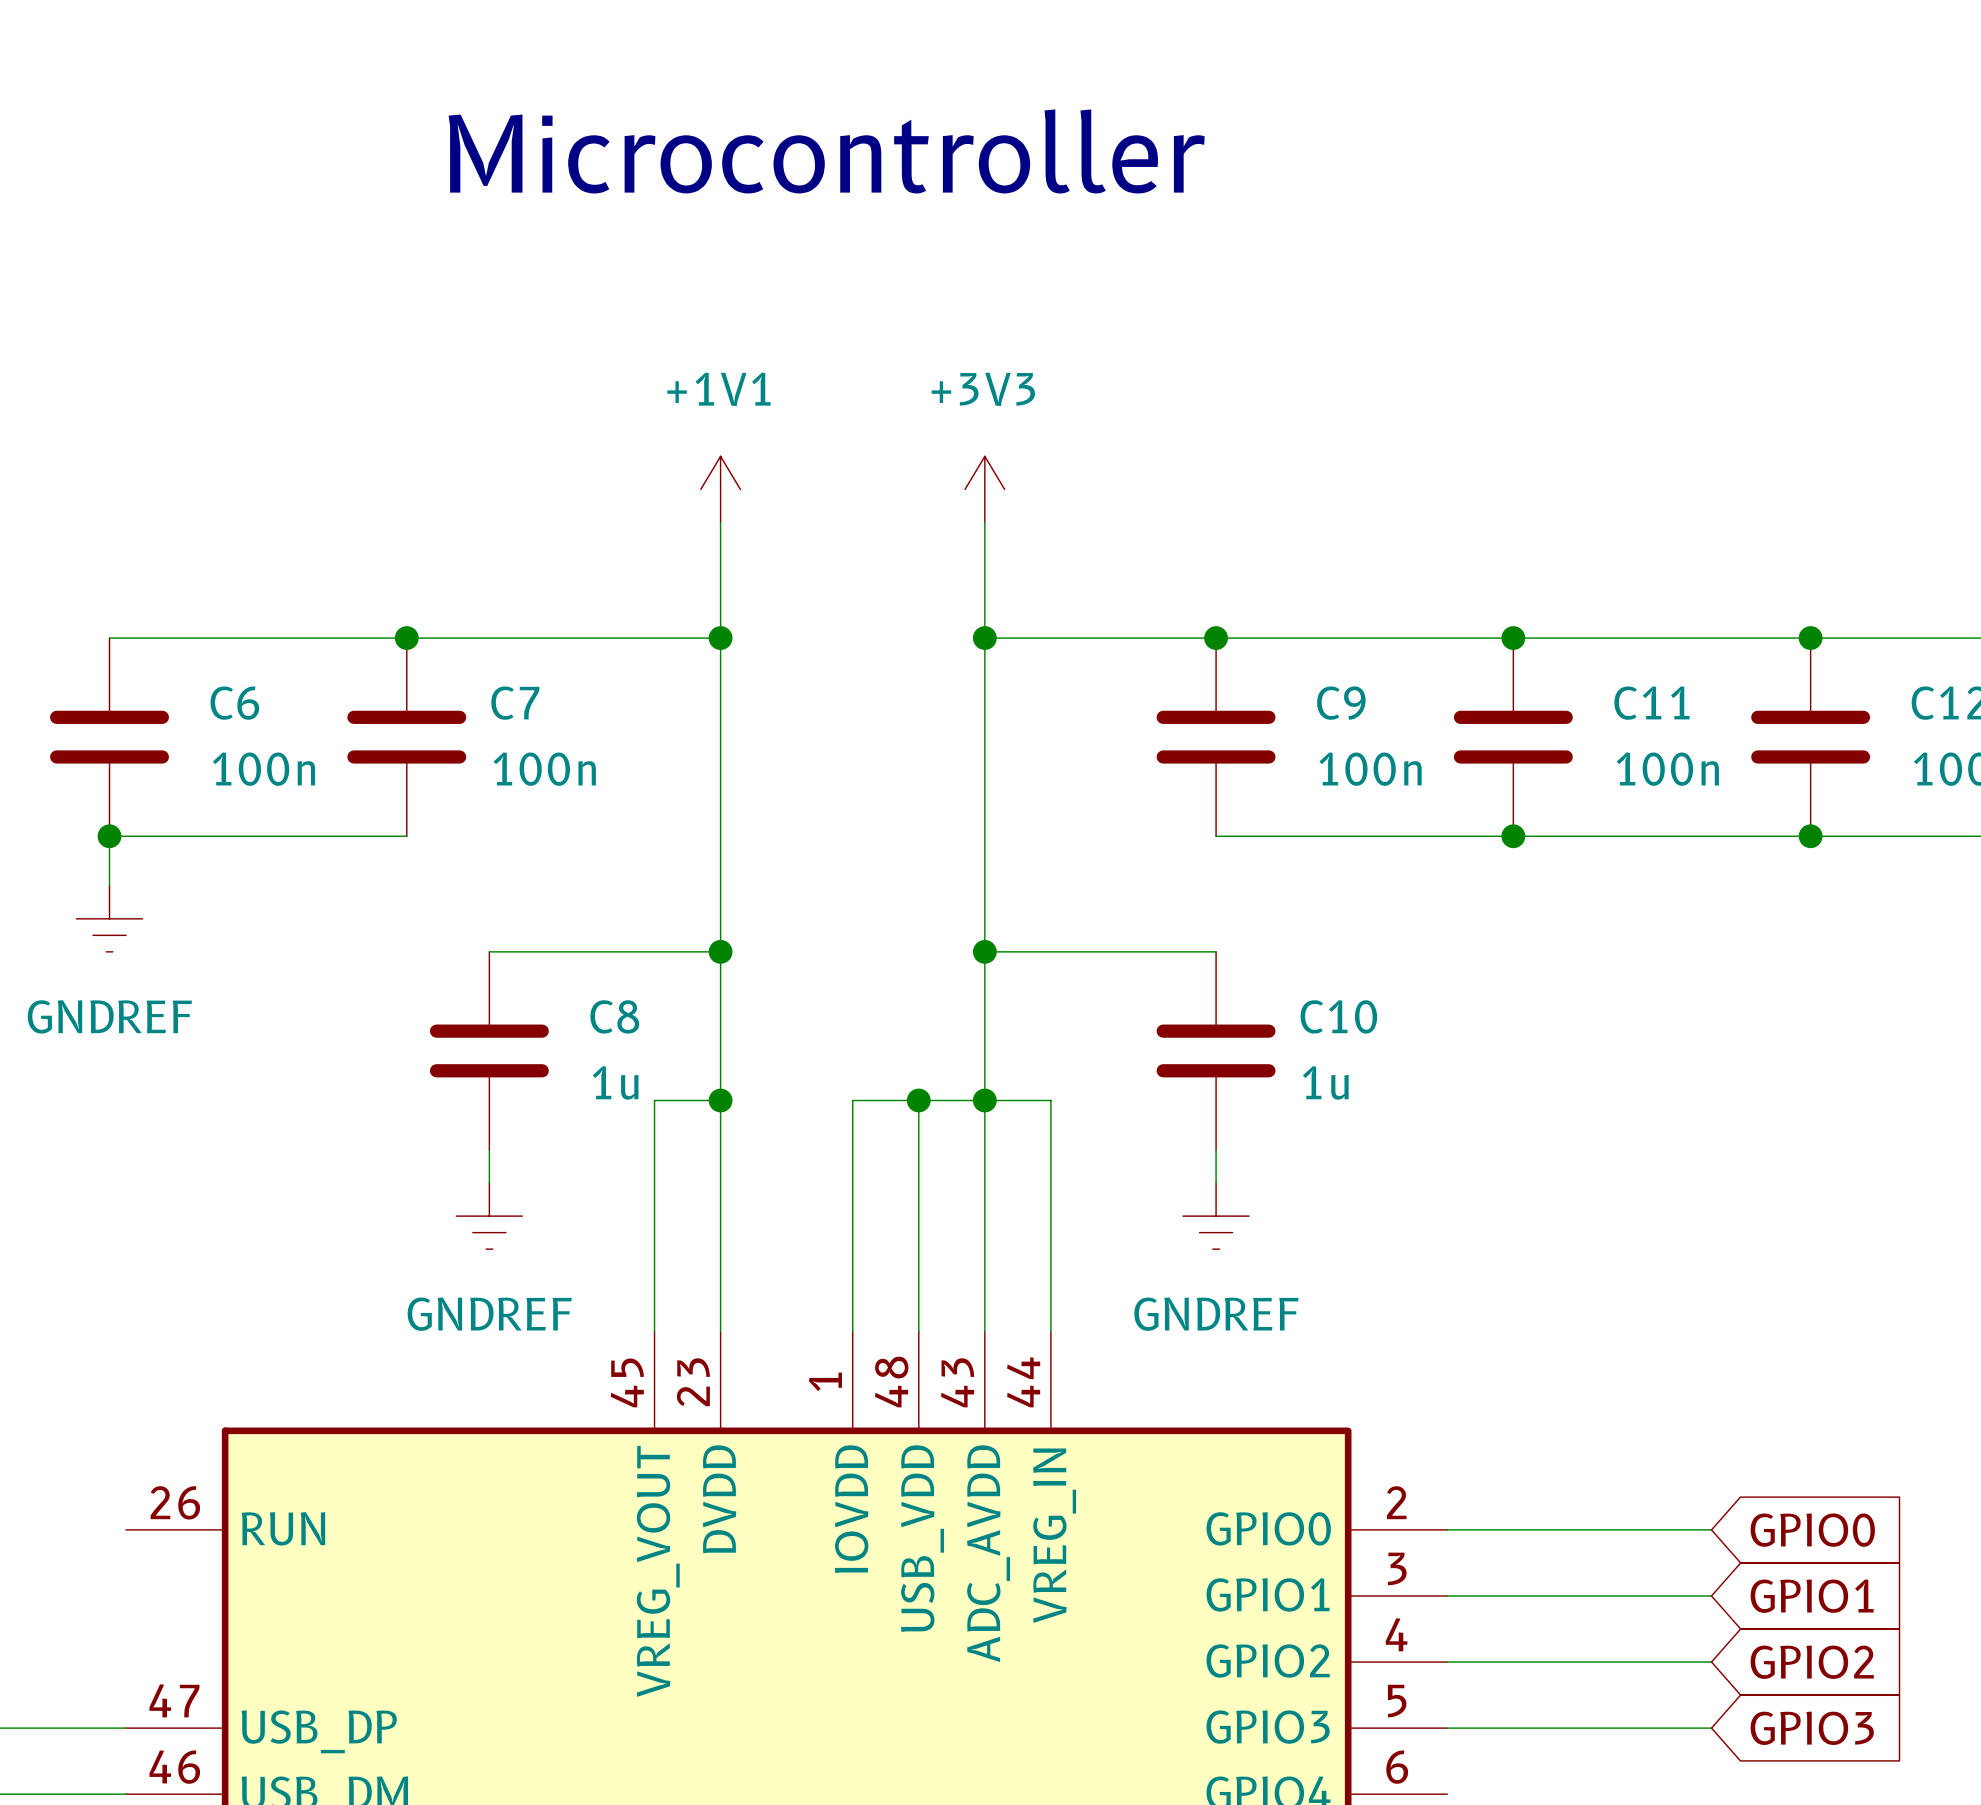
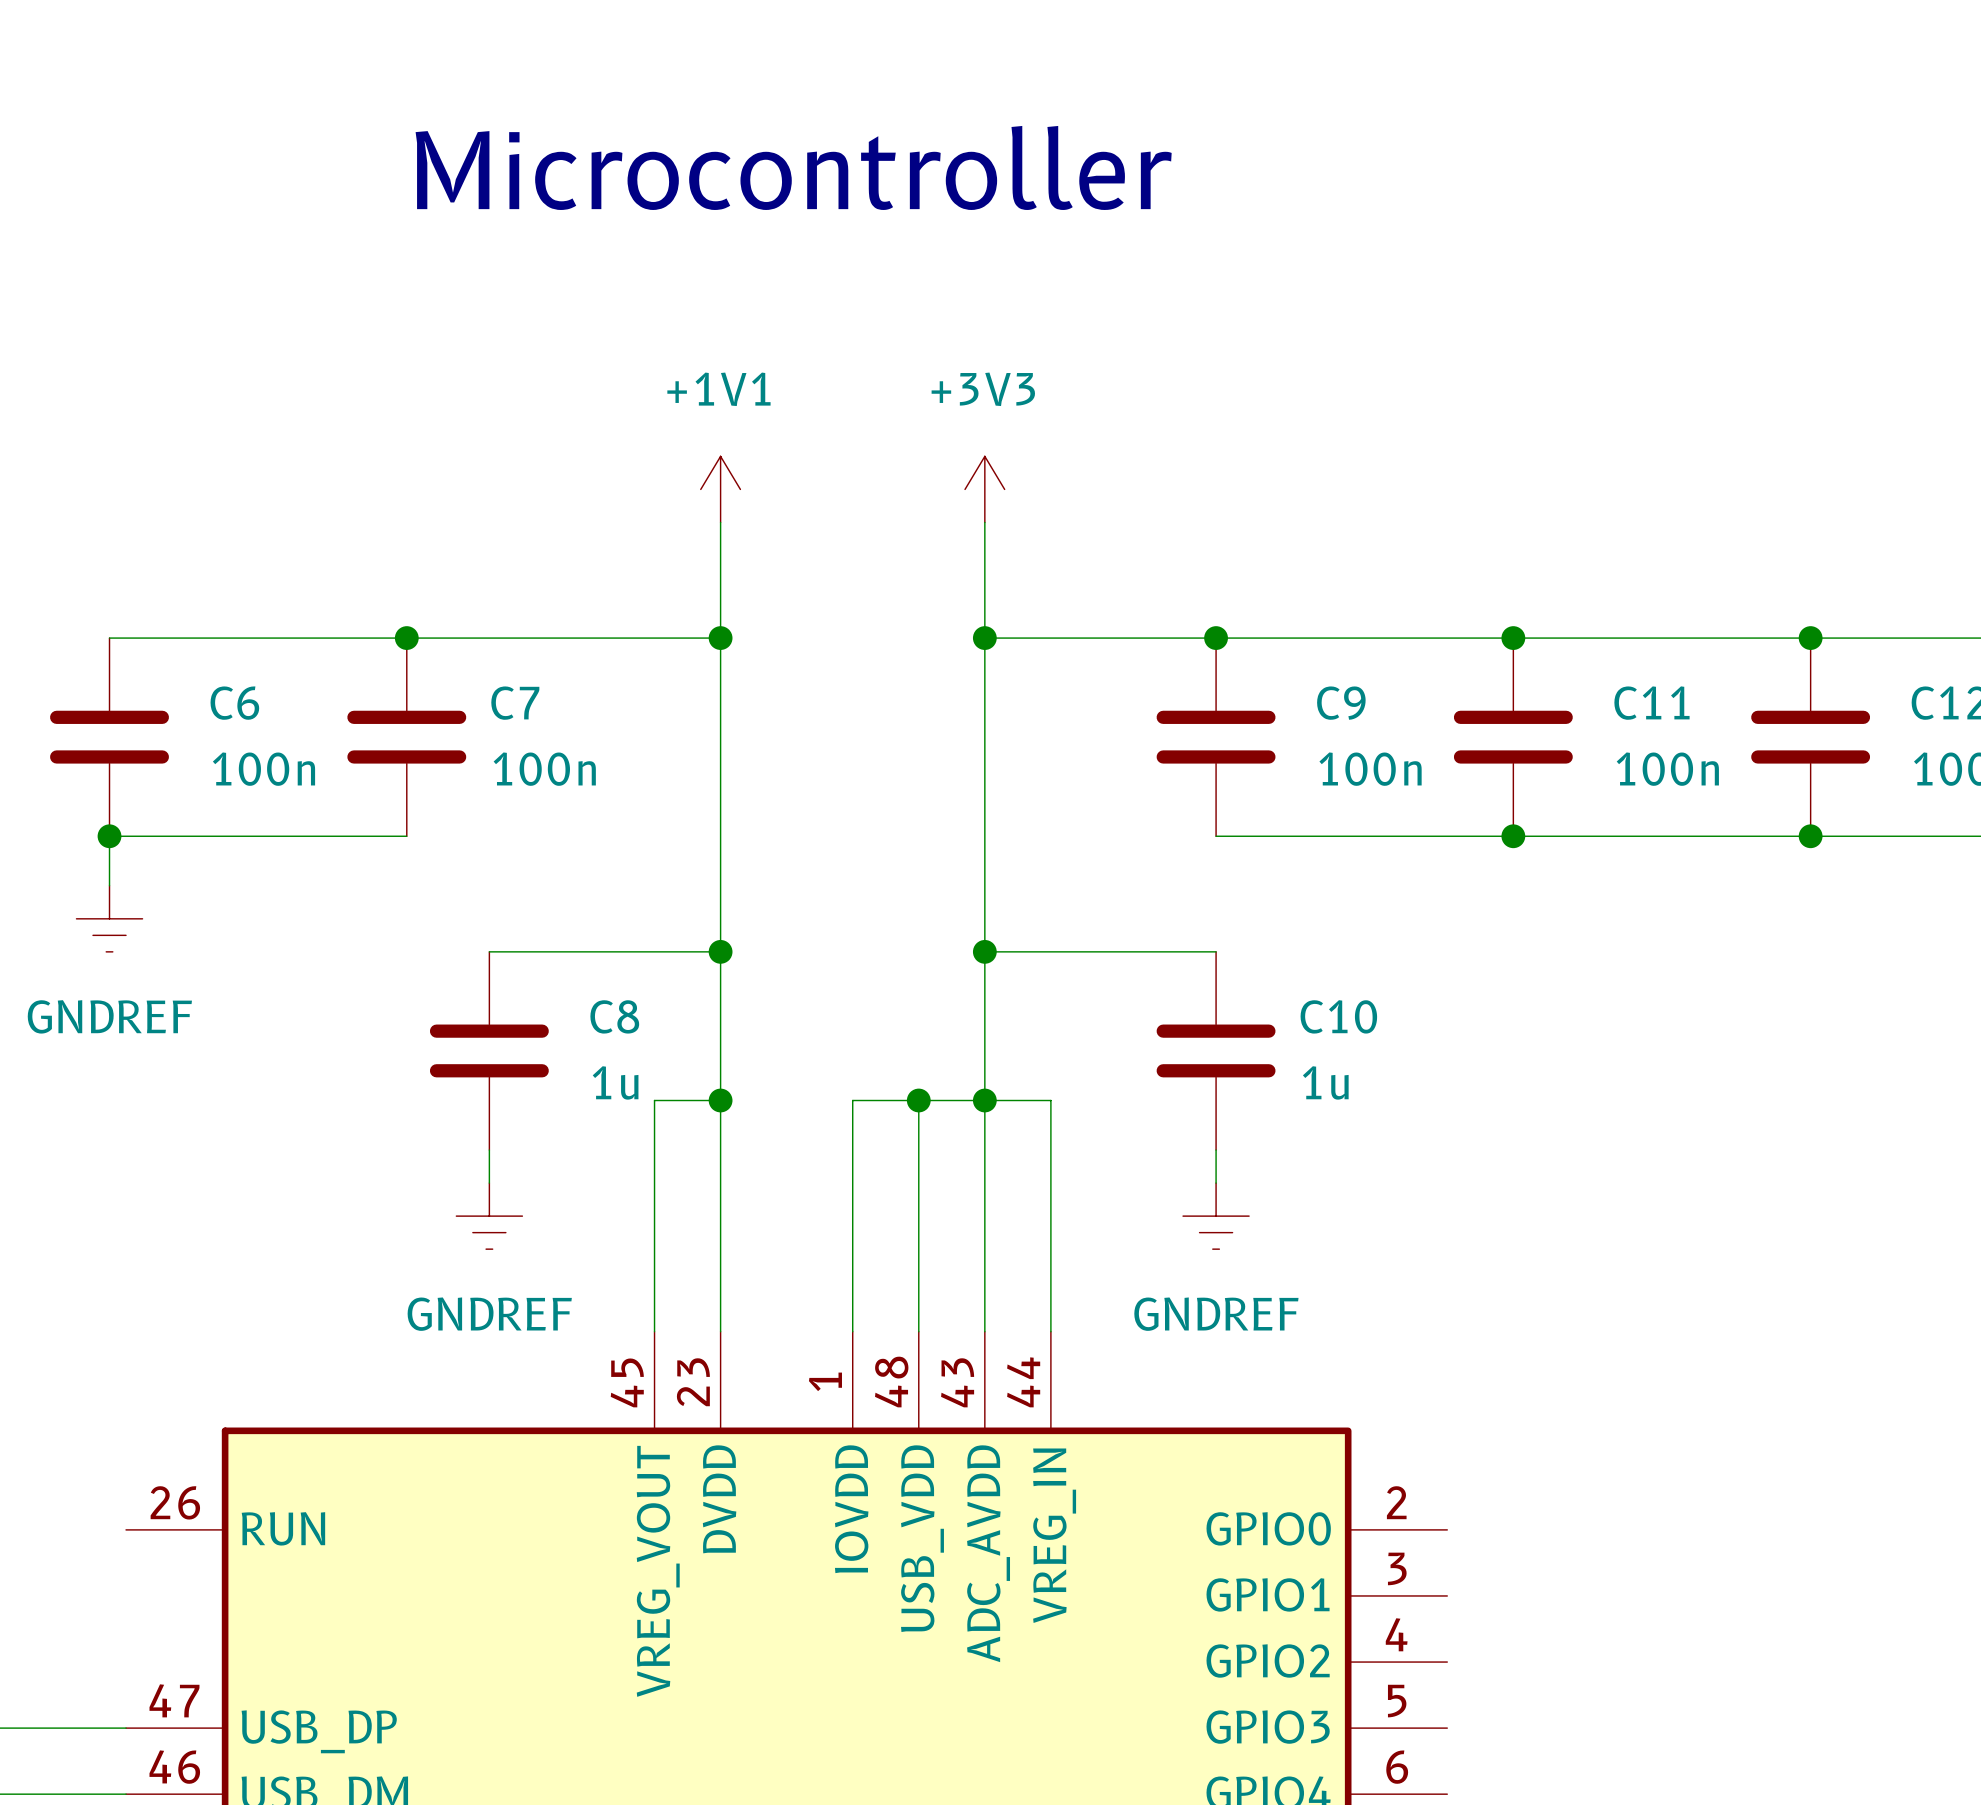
text position: Microcontroller (826, 151) -> Microcontroller (793, 167)
wire: (1447, 1529) (1711, 1529) -> none
global label: GPIO0 (1812, 1530) -> none
wire: (1447, 1595) (1711, 1595) -> none
global label: GPIO1 (1812, 1596) -> none
wire: (1447, 1662) (1711, 1662) -> none
global label: GPIO2 (1812, 1662) -> none
wire: (1447, 1728) (1711, 1728) -> none
global label: GPIO3 (1812, 1728) -> none

